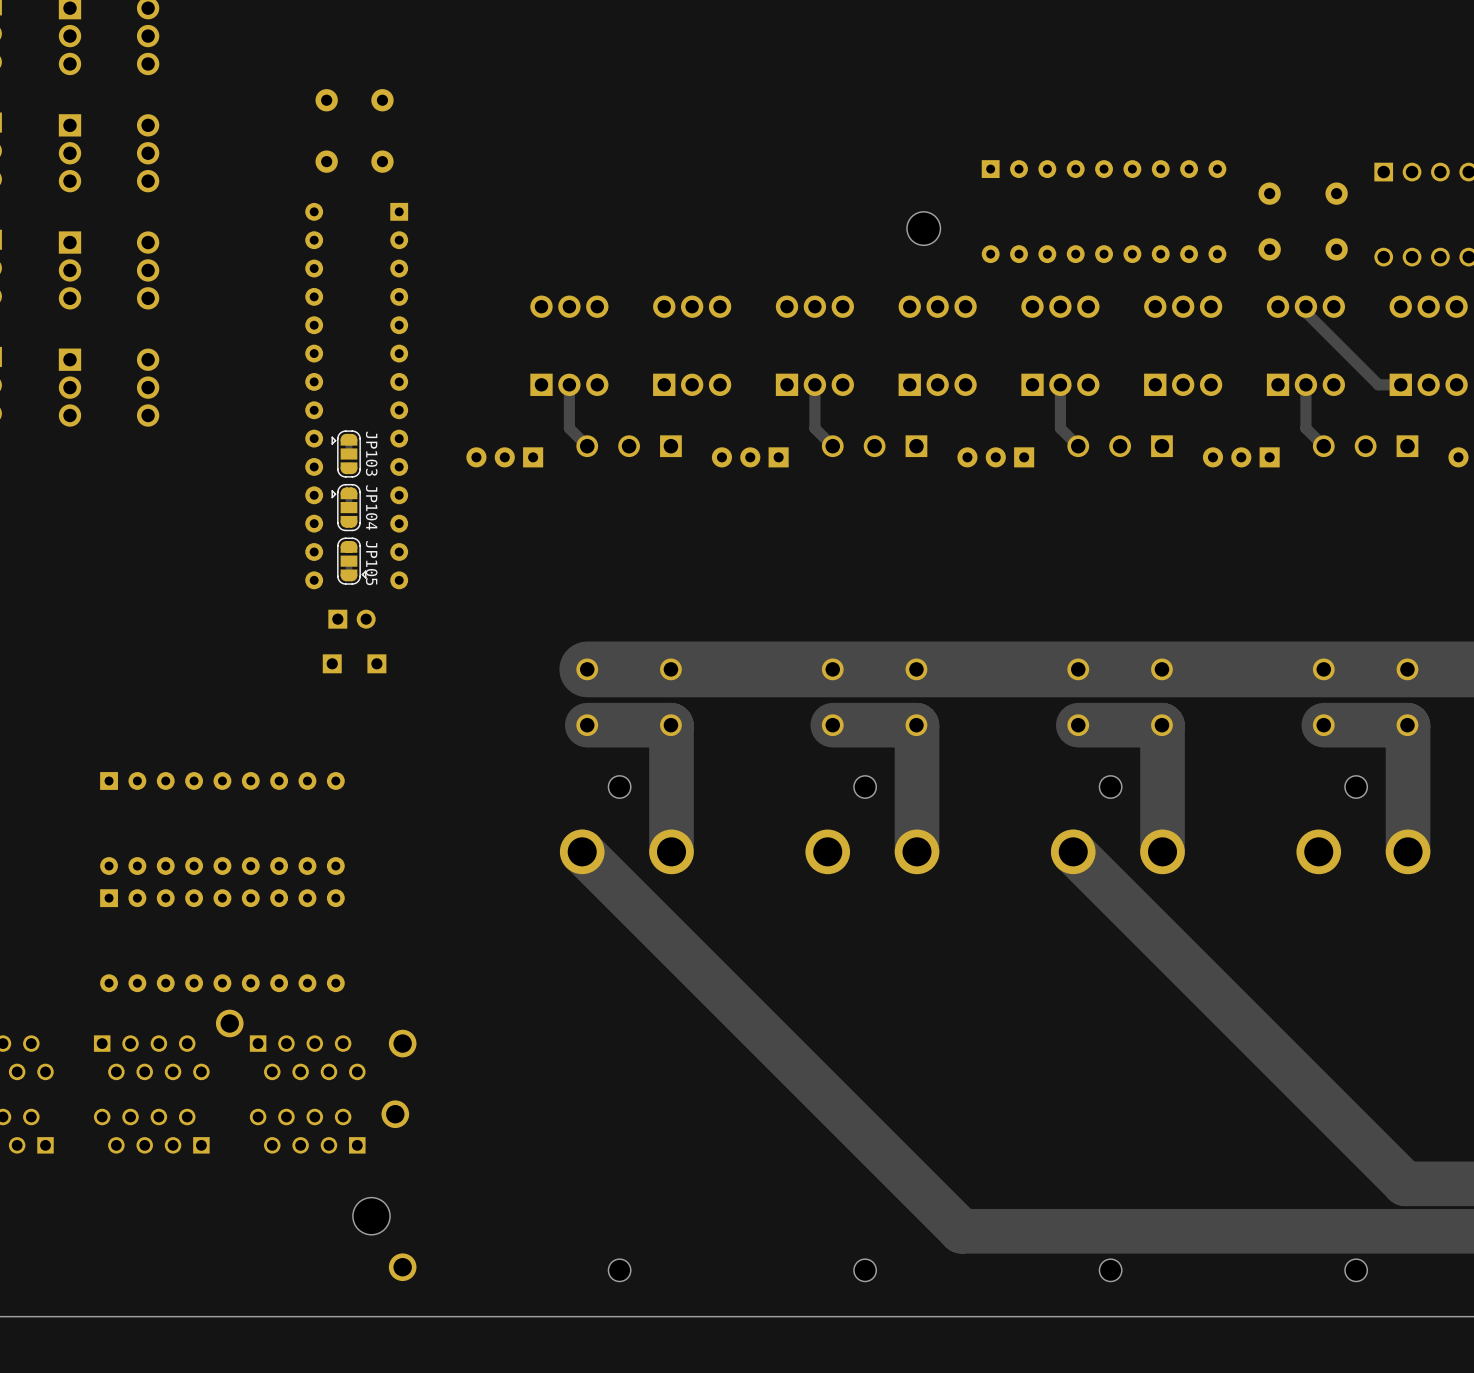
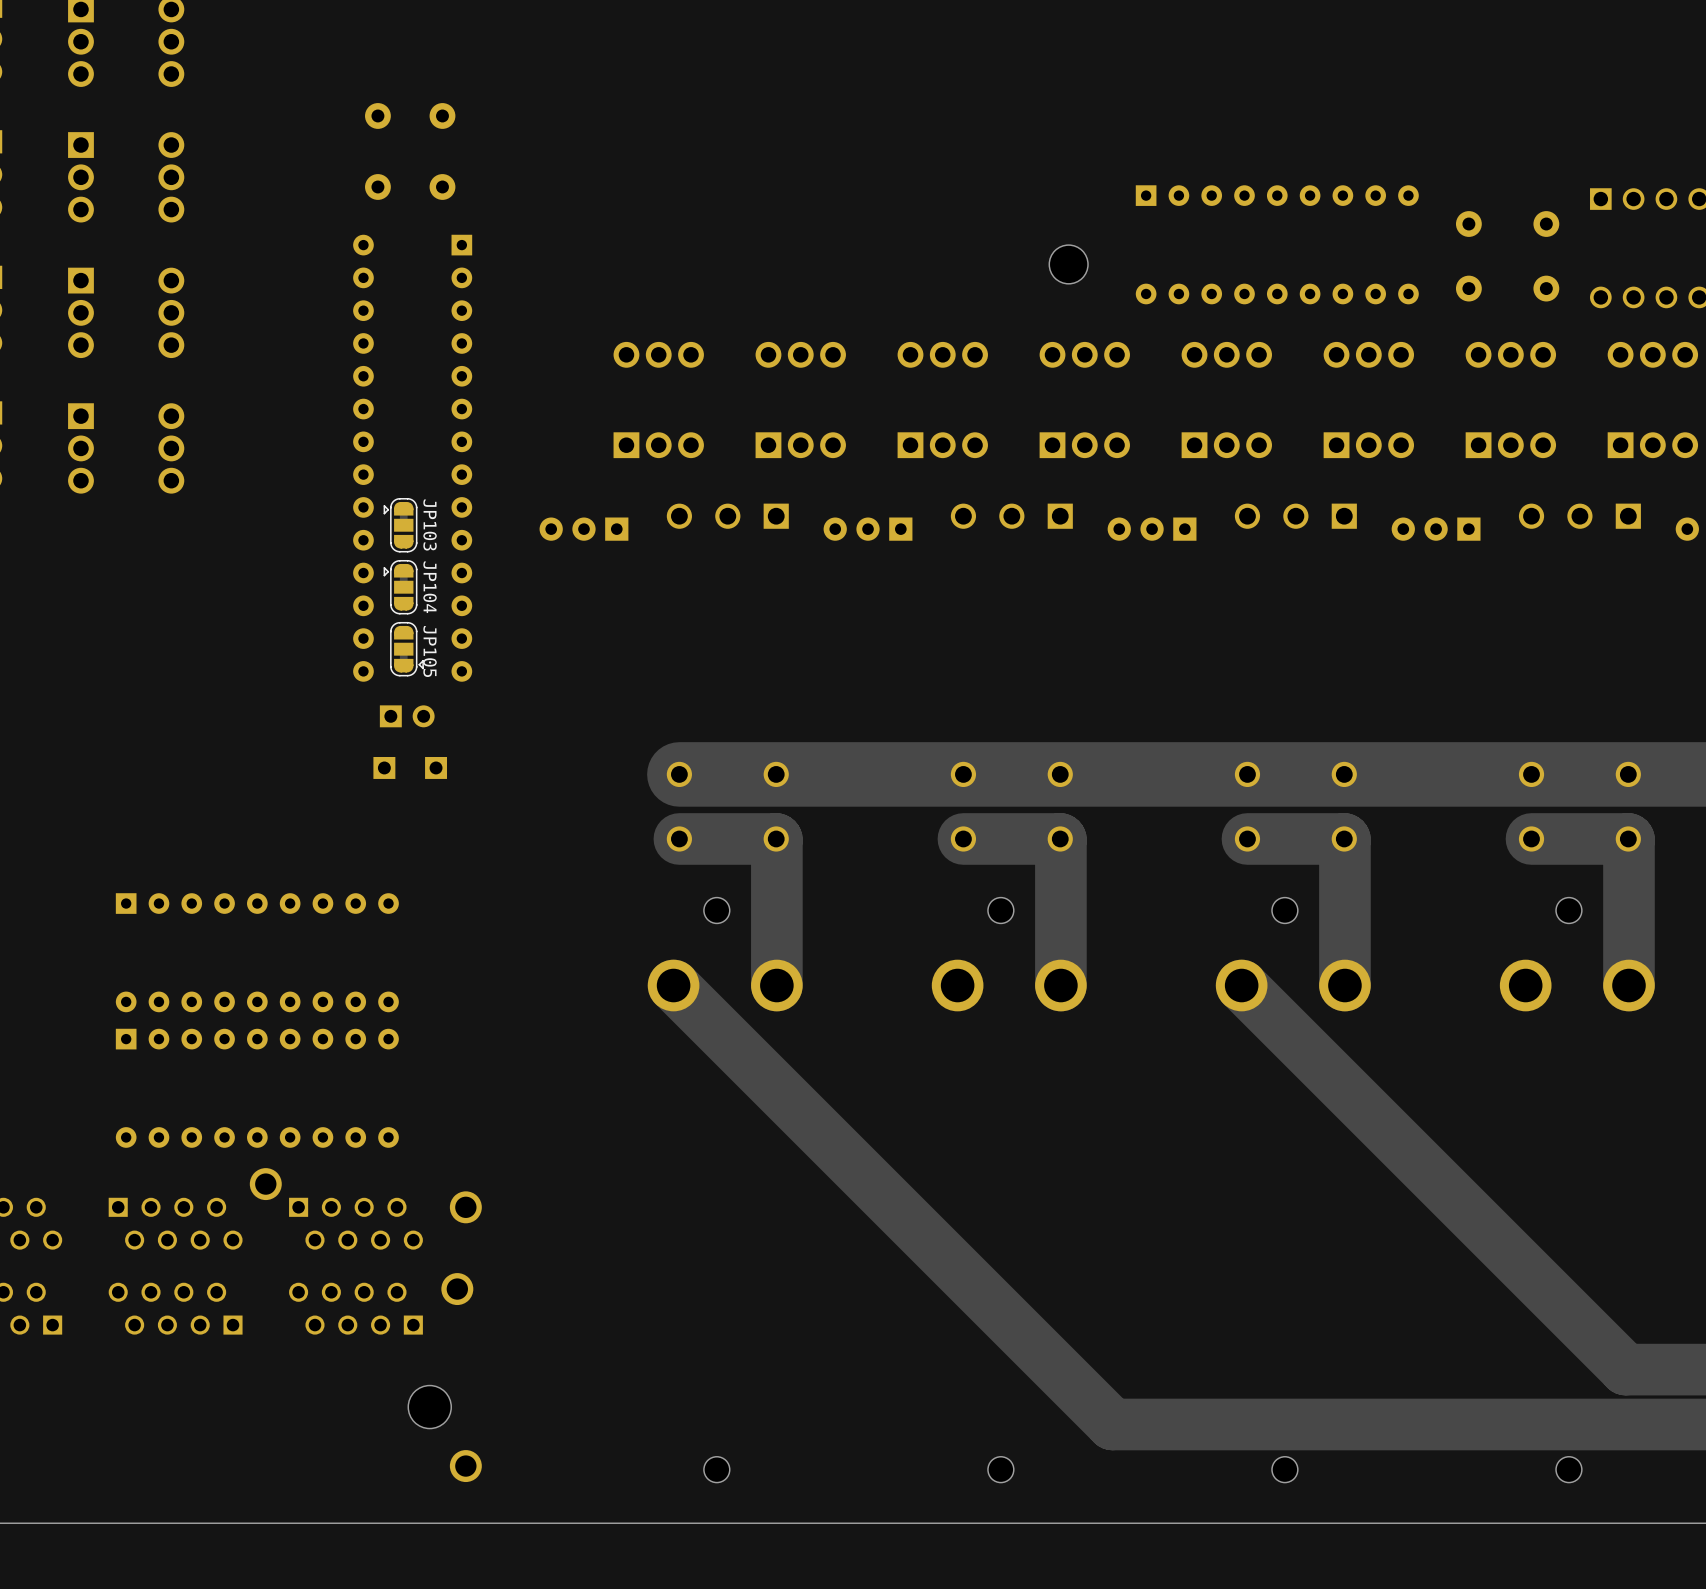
track: (1305, 306) (1305, 312) (1378, 384) (1400, 384) -> none
track: (569, 384) (569, 428) (587, 446) -> none
track: (814, 384) (814, 428) (832, 446) -> none
track: (1060, 384) (1060, 428) (1078, 446) -> none
track: (1305, 384) (1305, 428) (1323, 446) -> none

